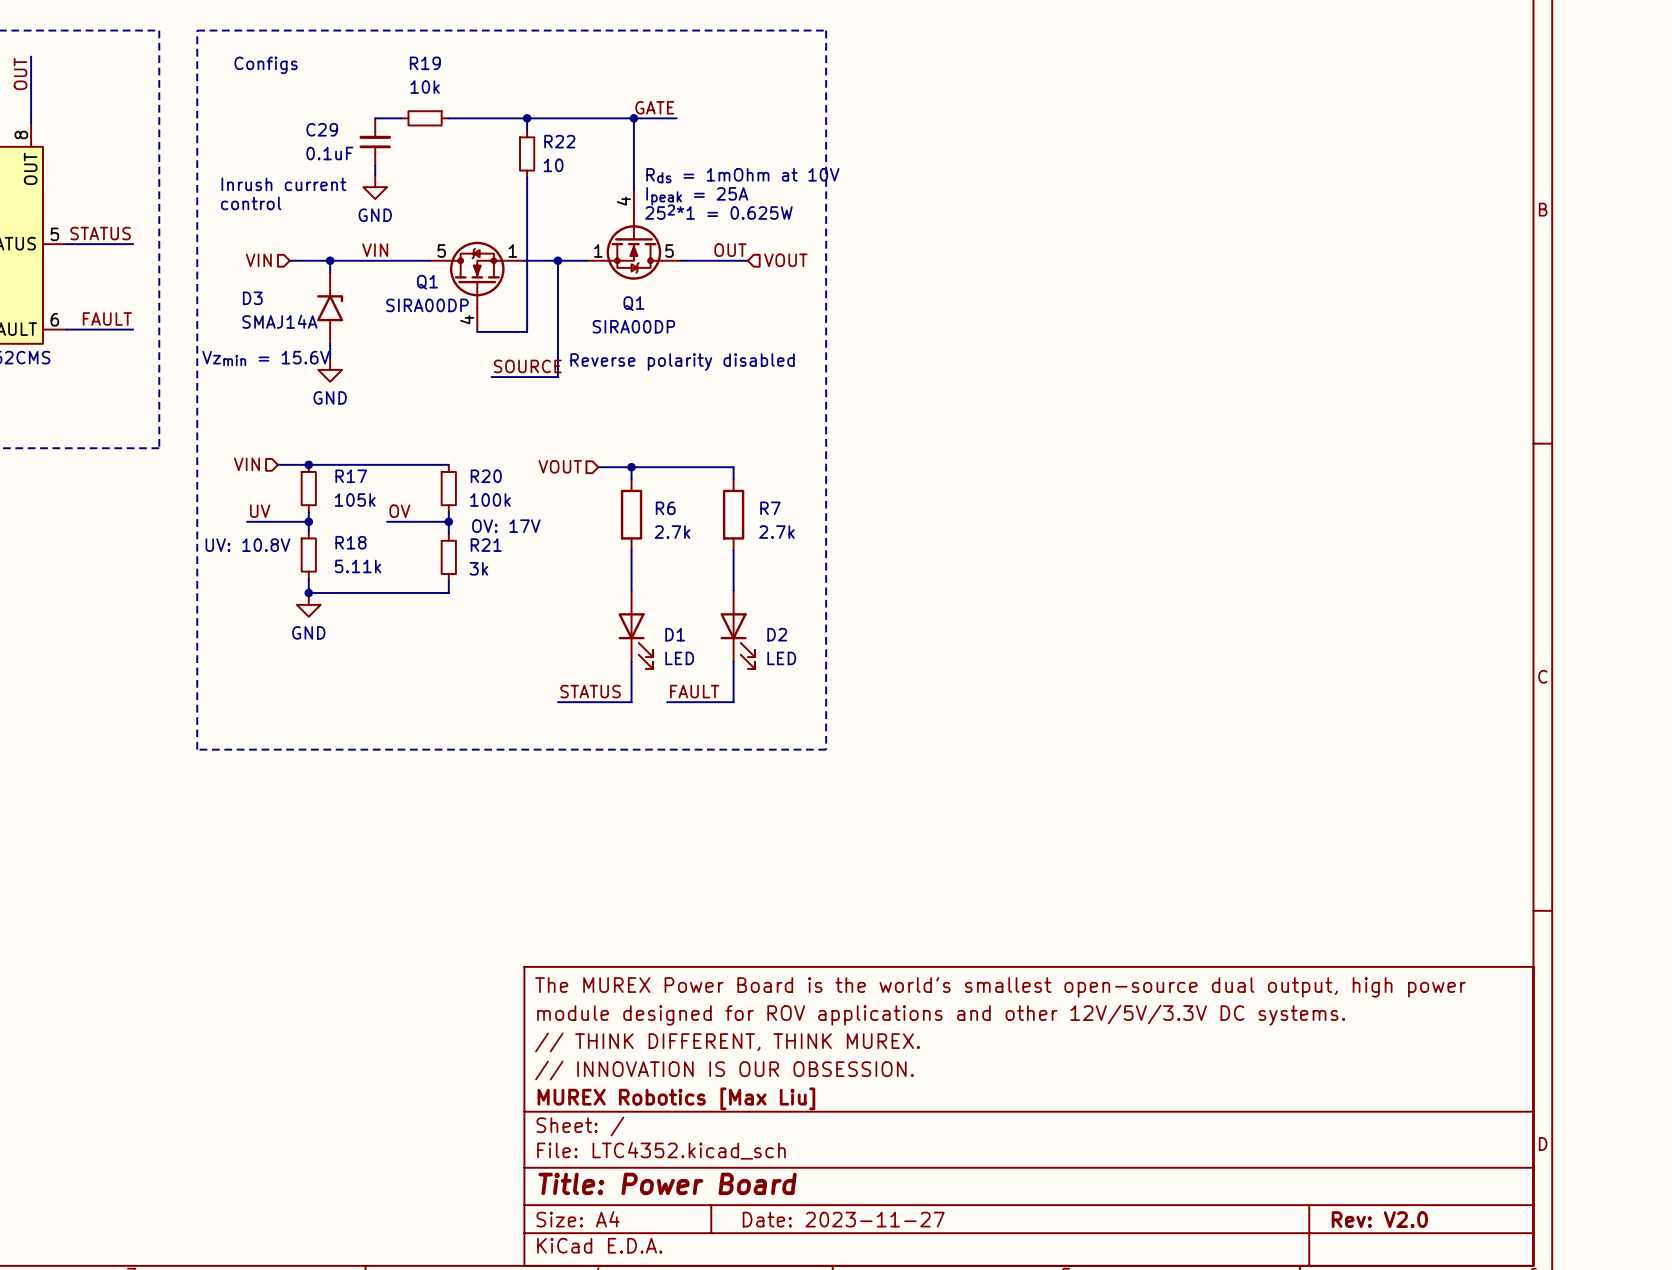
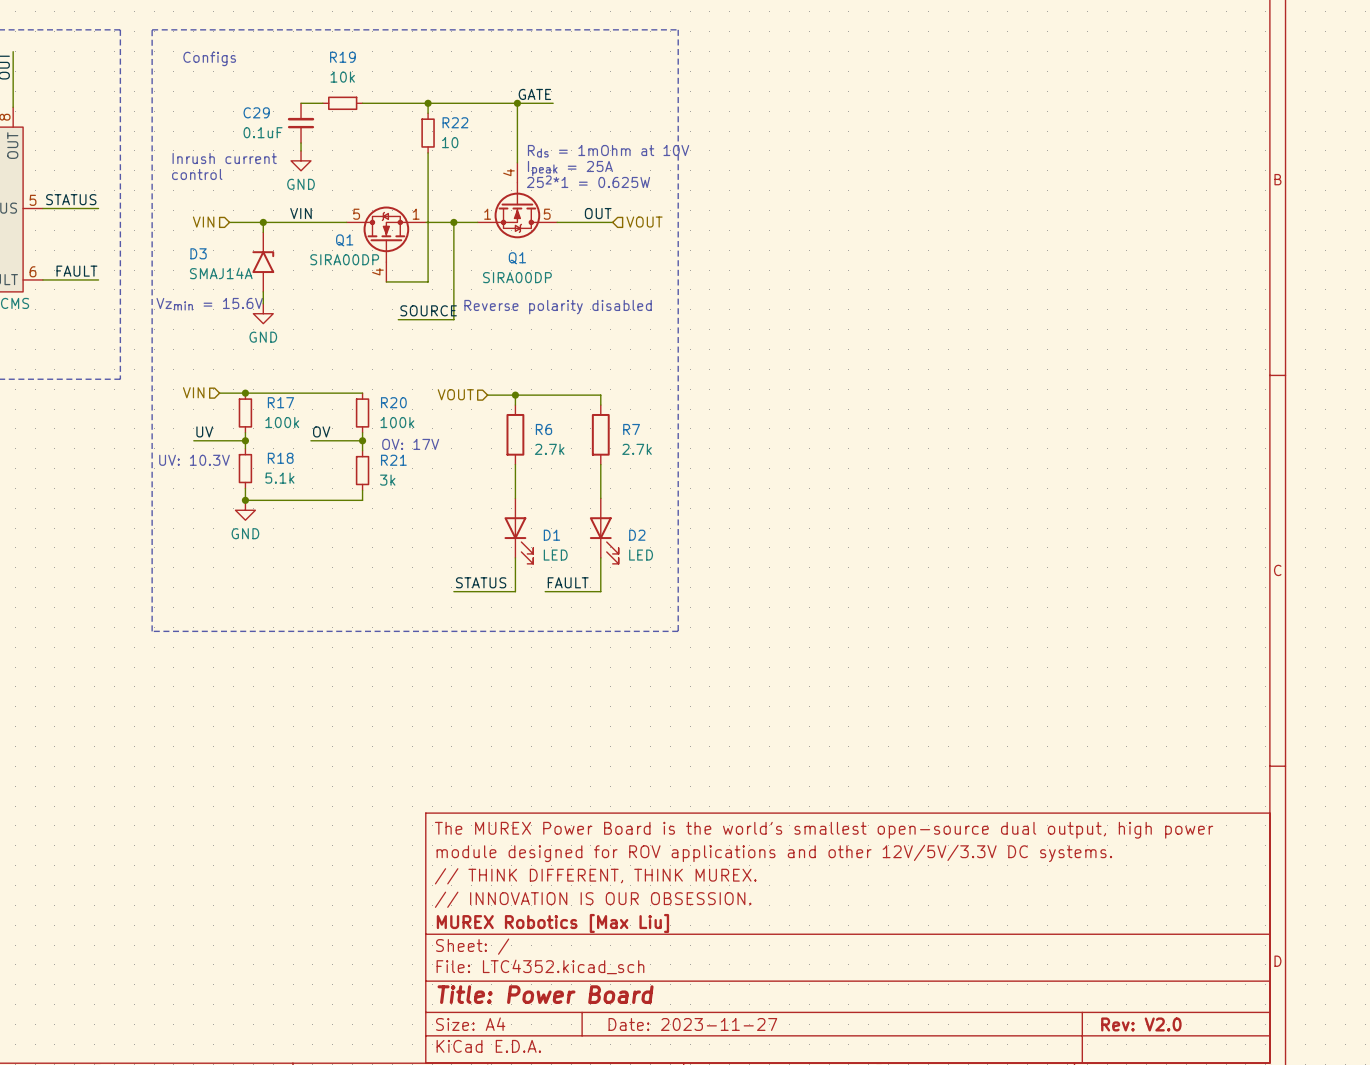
R17 value: 105k (355, 500) -> 100k (282, 422)
text: UV: 10.8V (247, 545) -> UV: 10.3V (194, 460)
R18 value: 5.11k (358, 566) -> 5.1k (279, 478)

